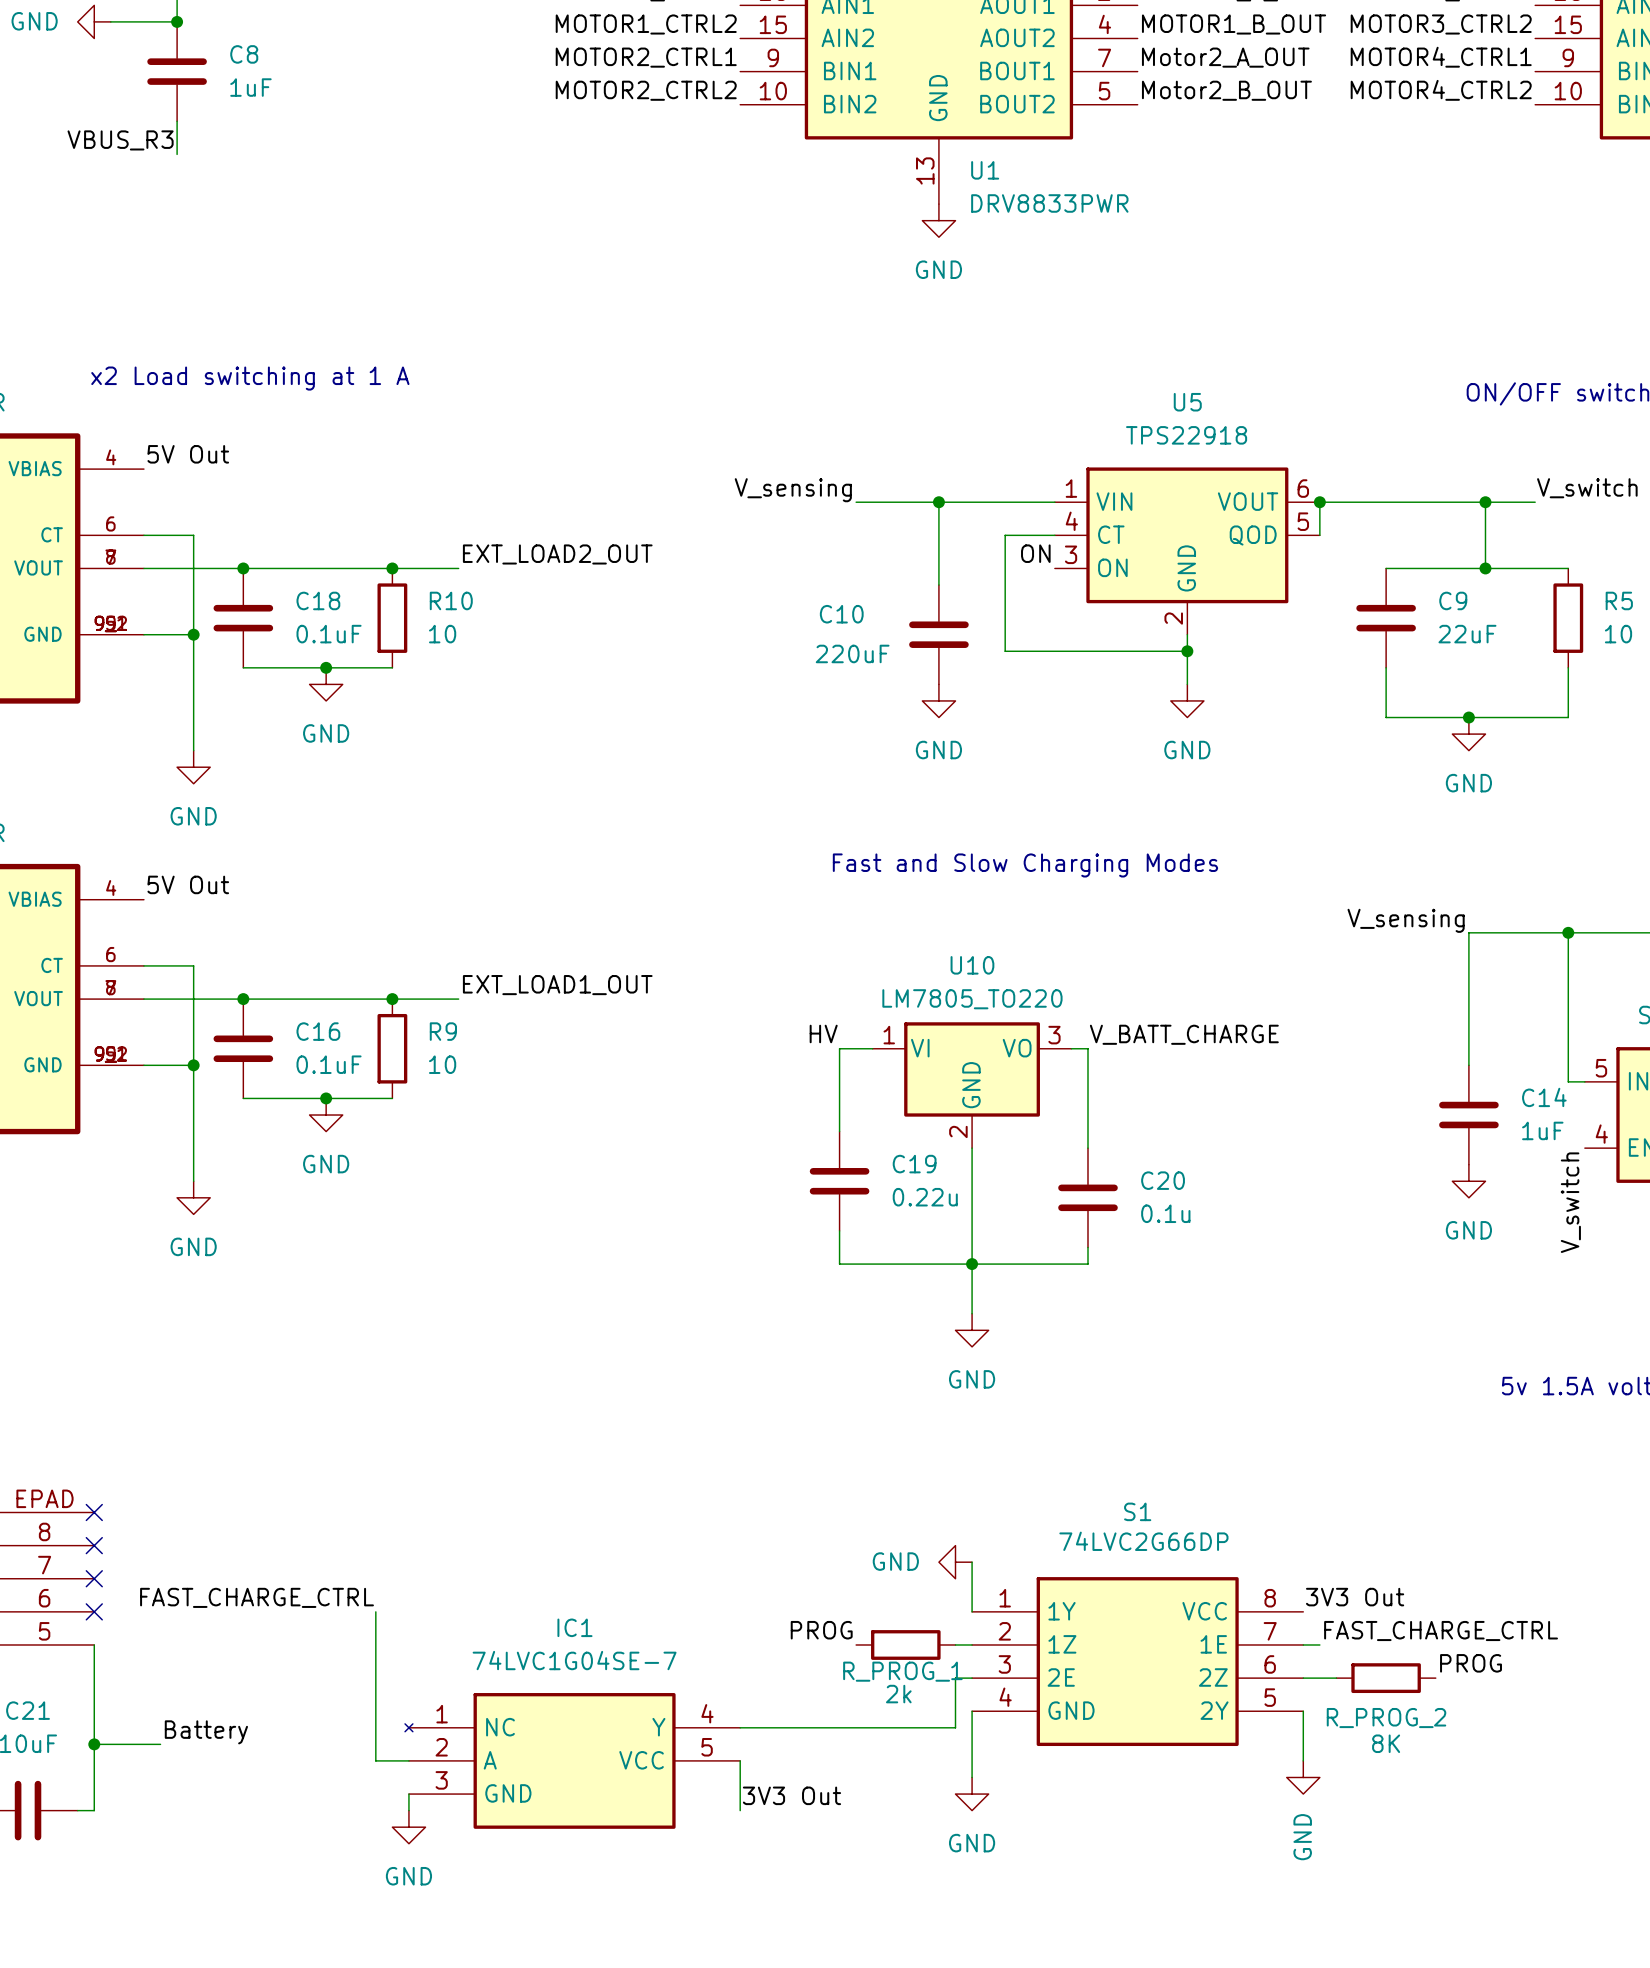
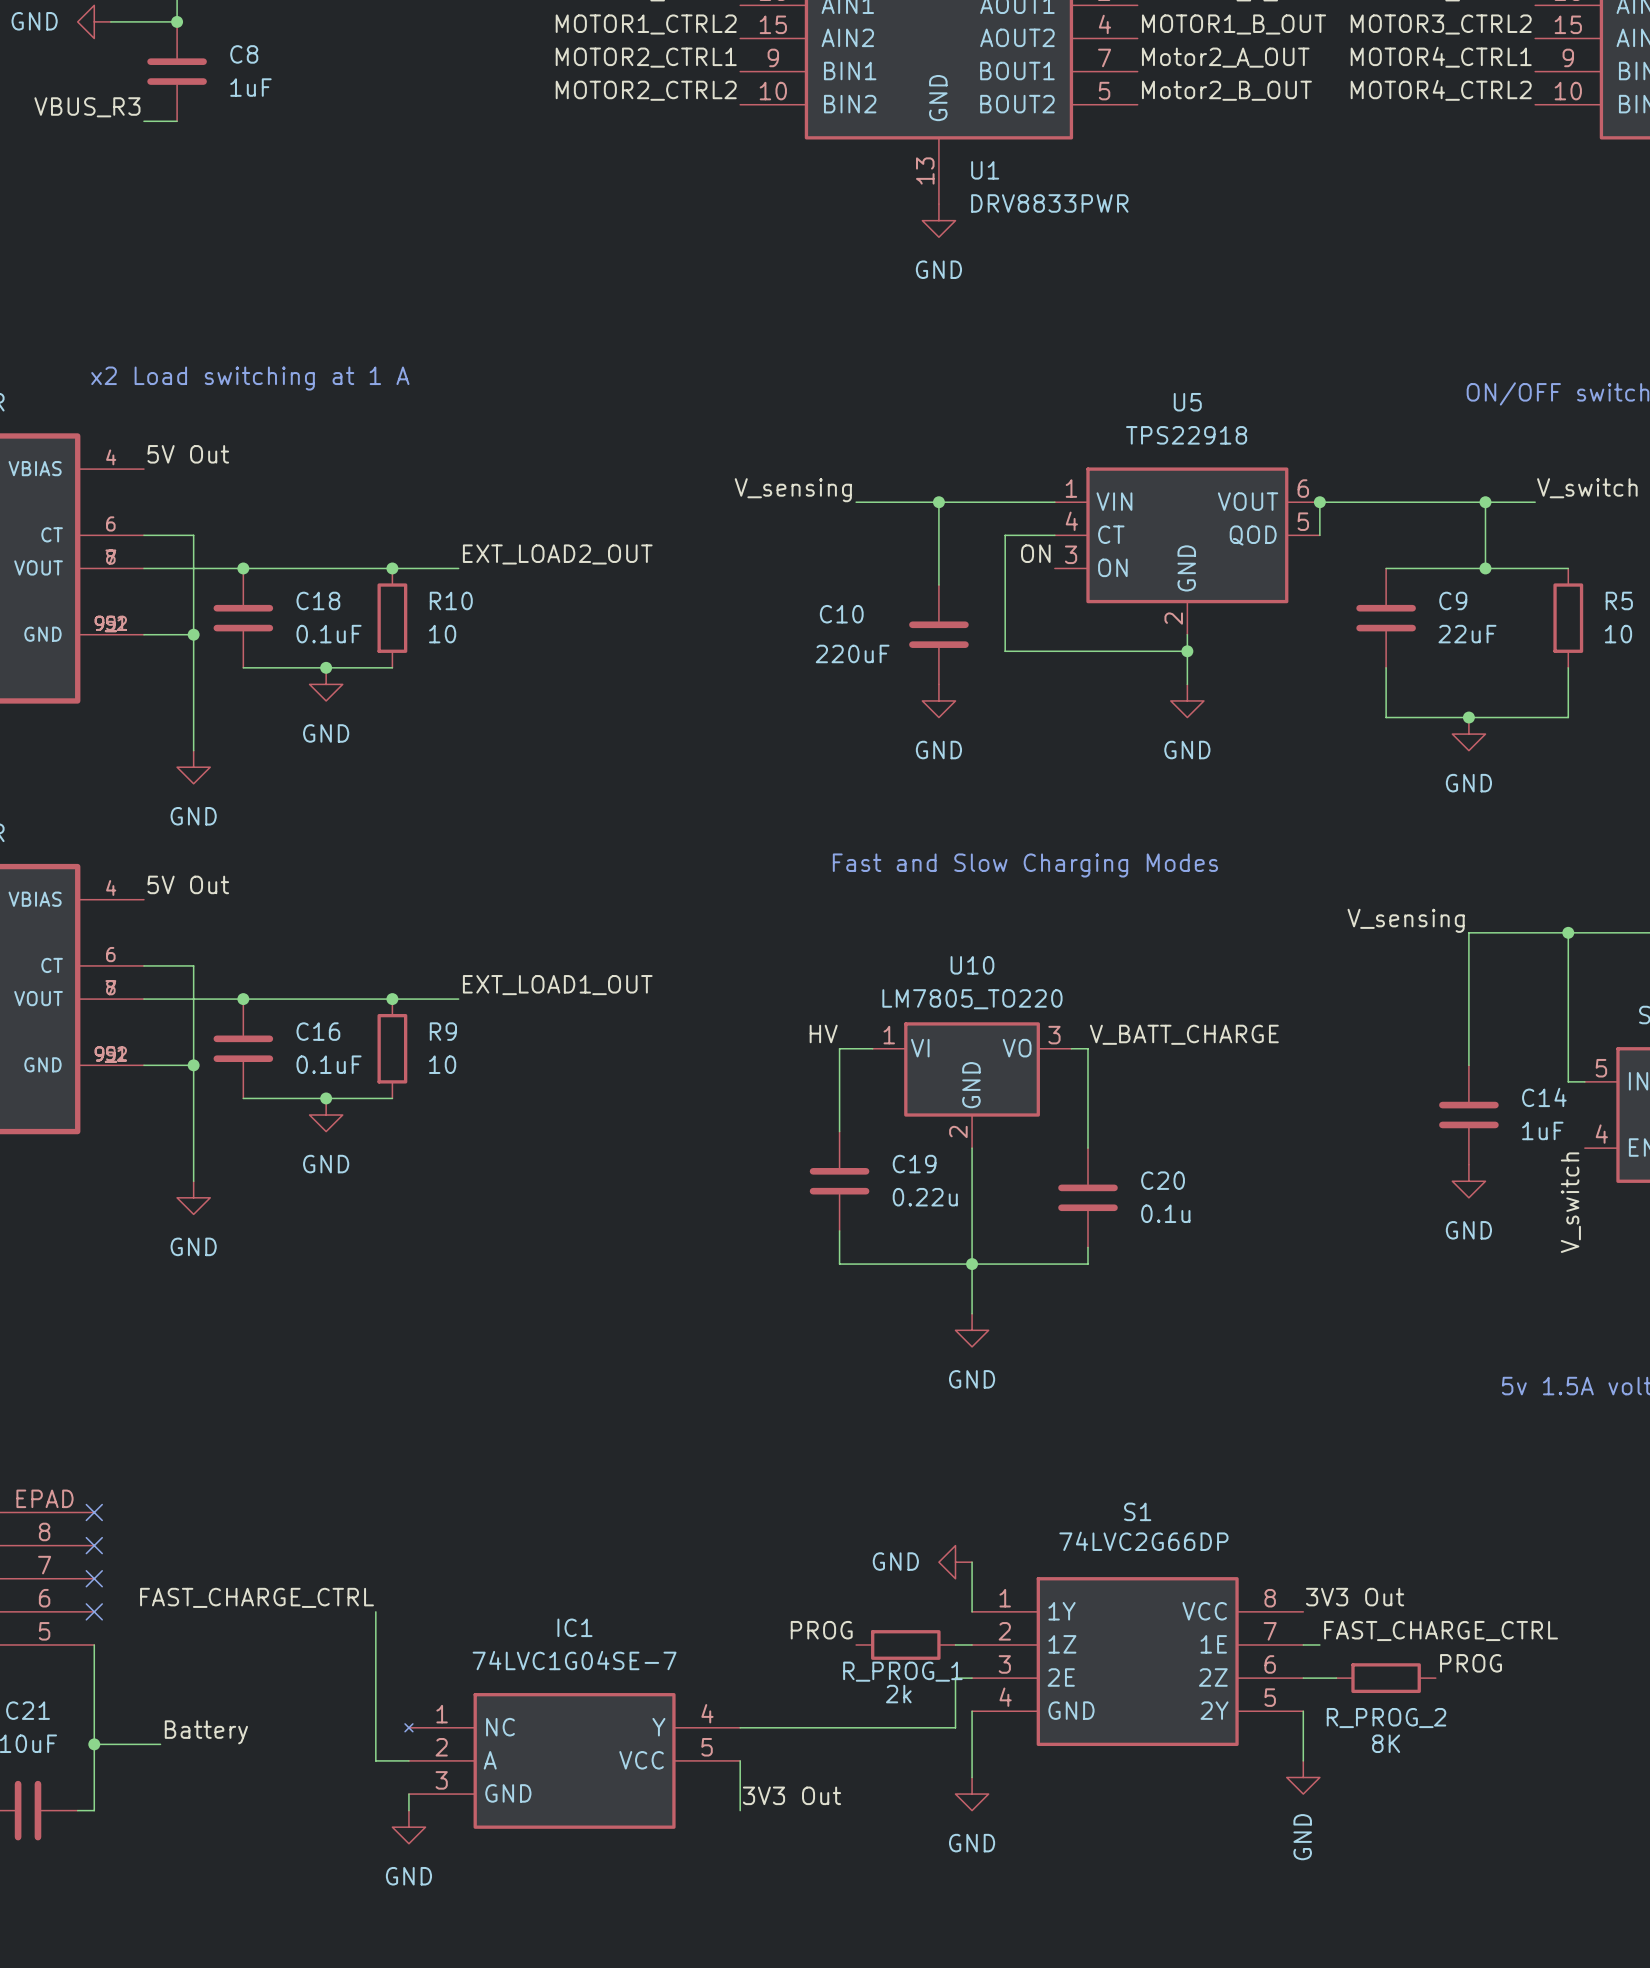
wire: (177, 121) (177, 154) -> (177, 121) (143, 121)
label position: VBUS_R3 (120, 140) -> VBUS_R3 (87, 107)

